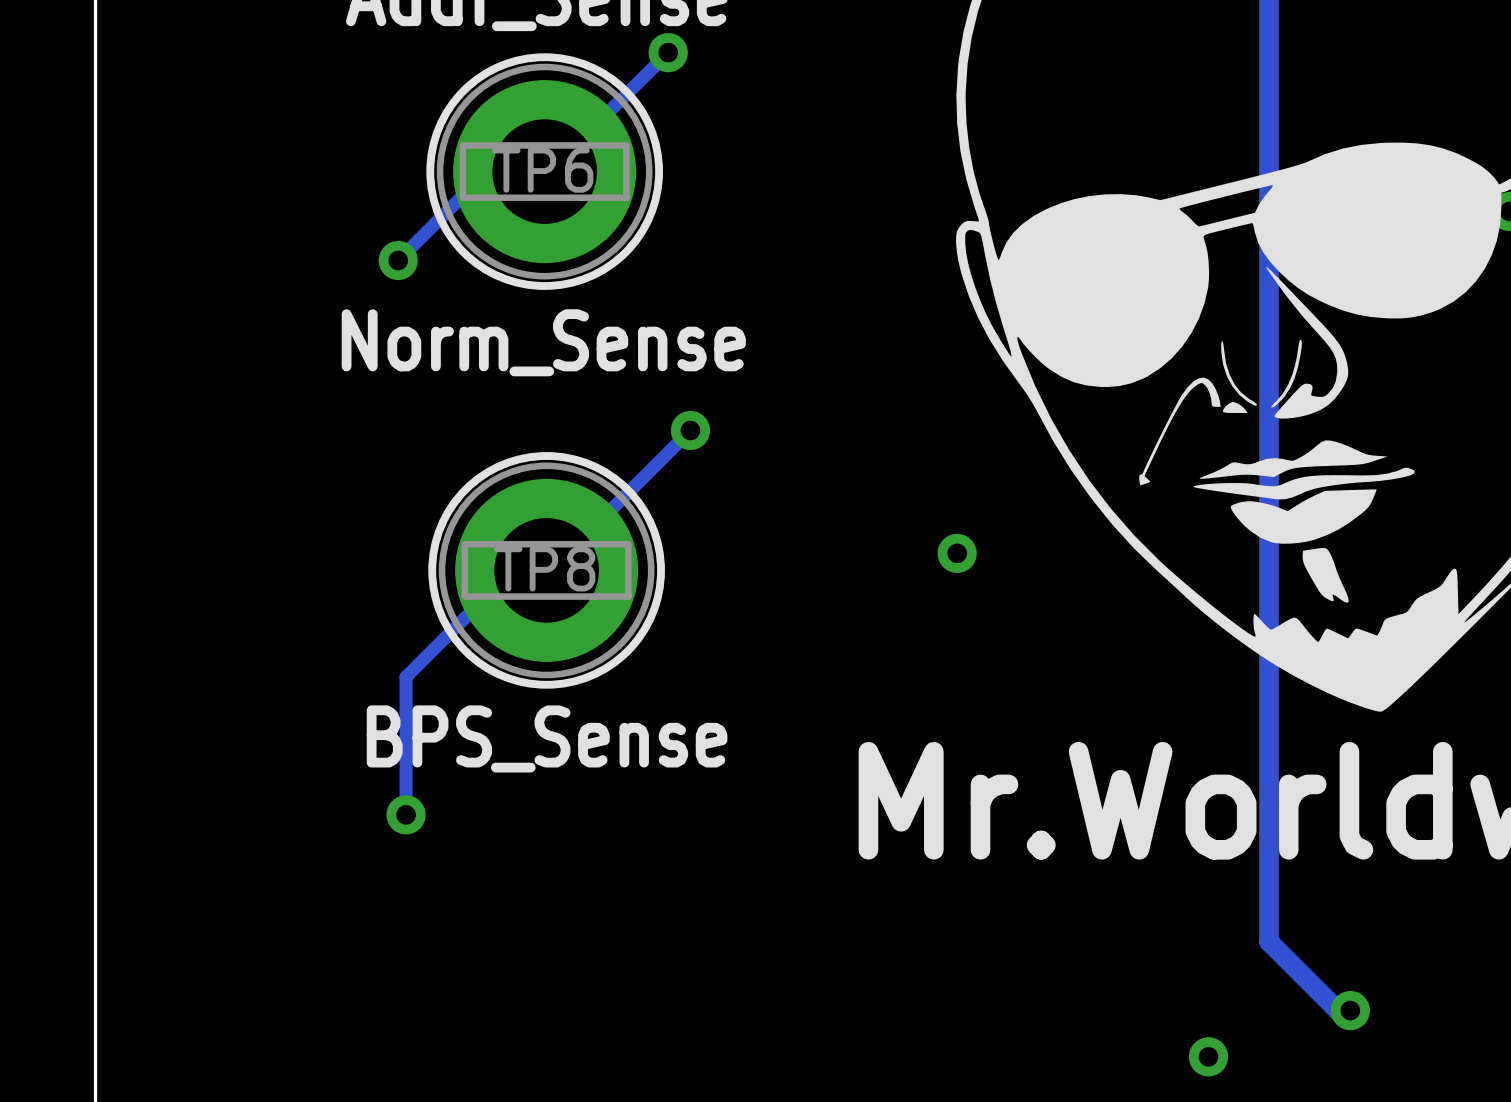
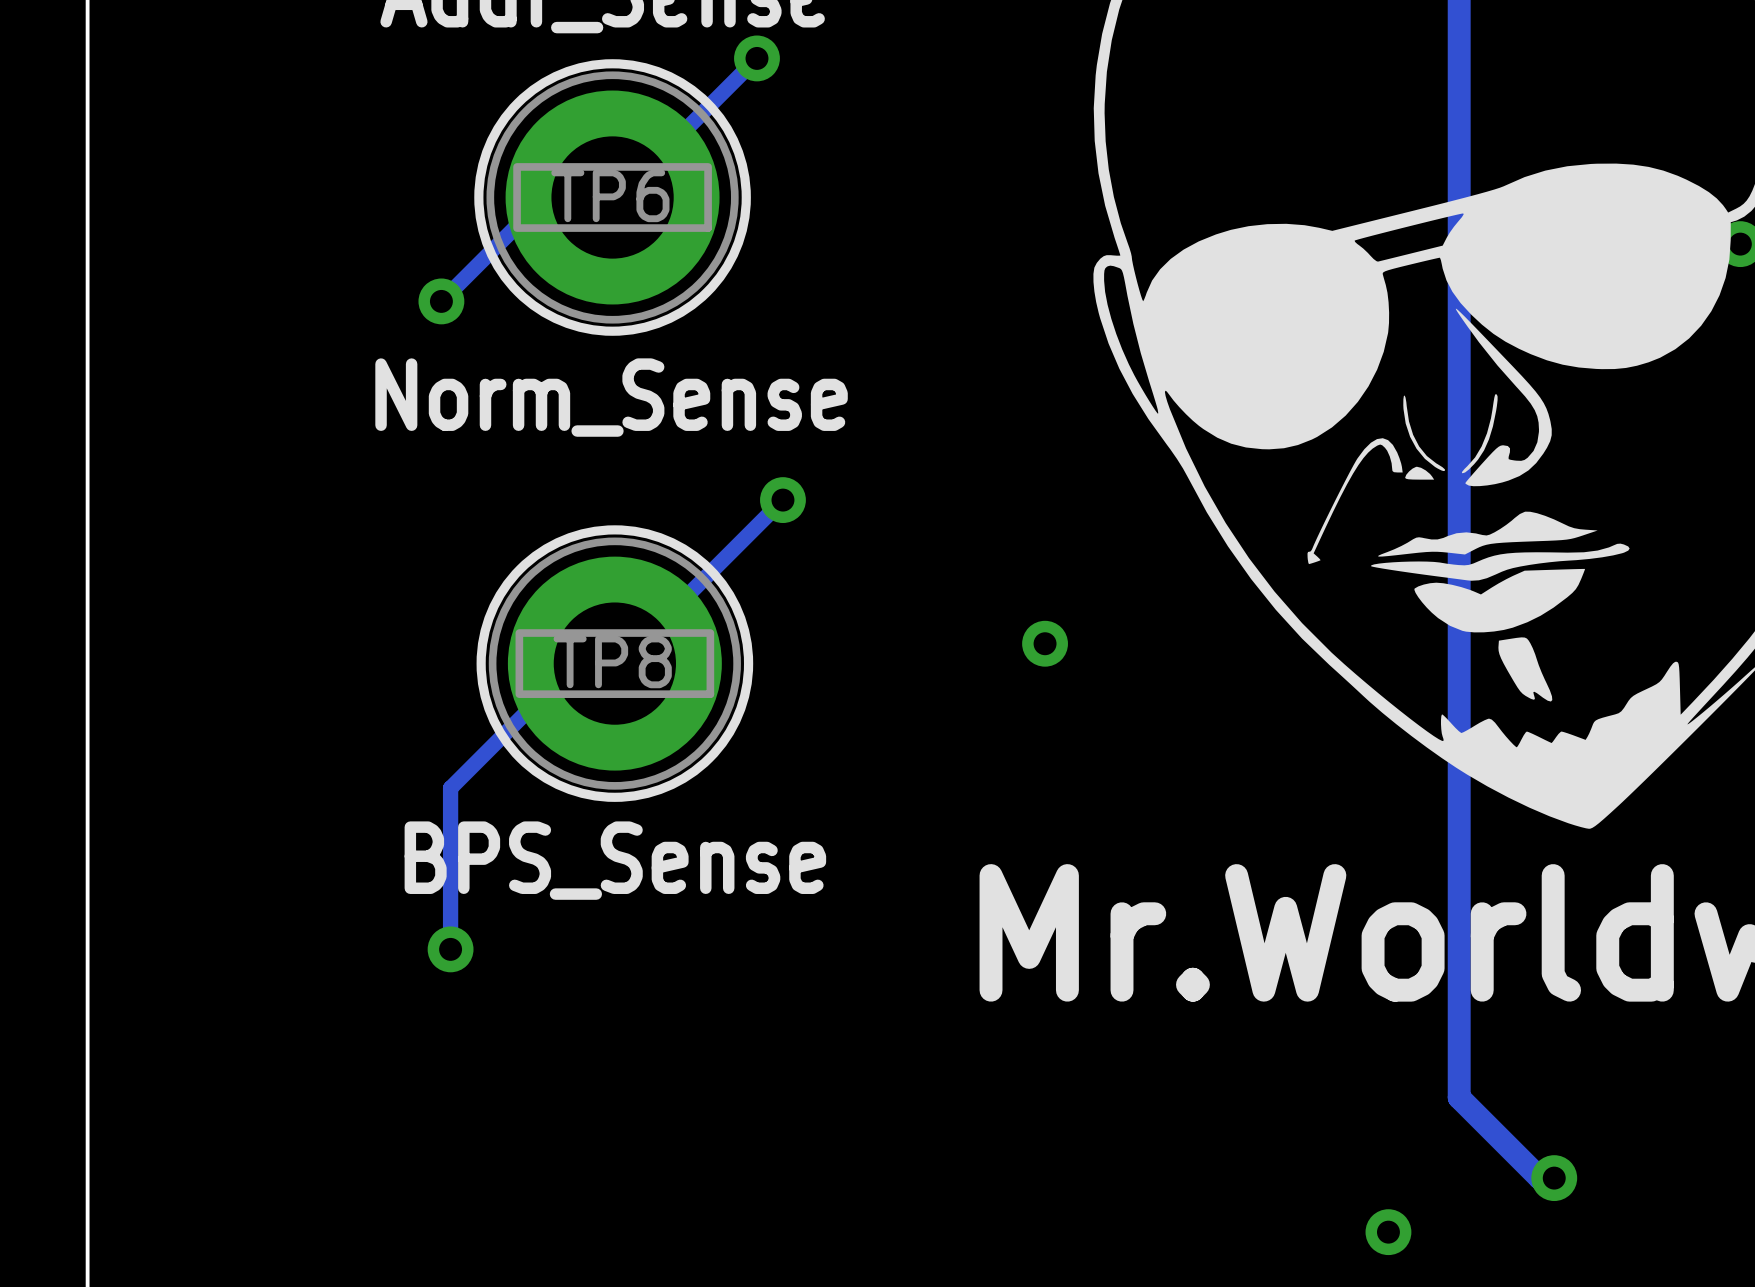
via position: (957, 553) -> (1045, 643)

